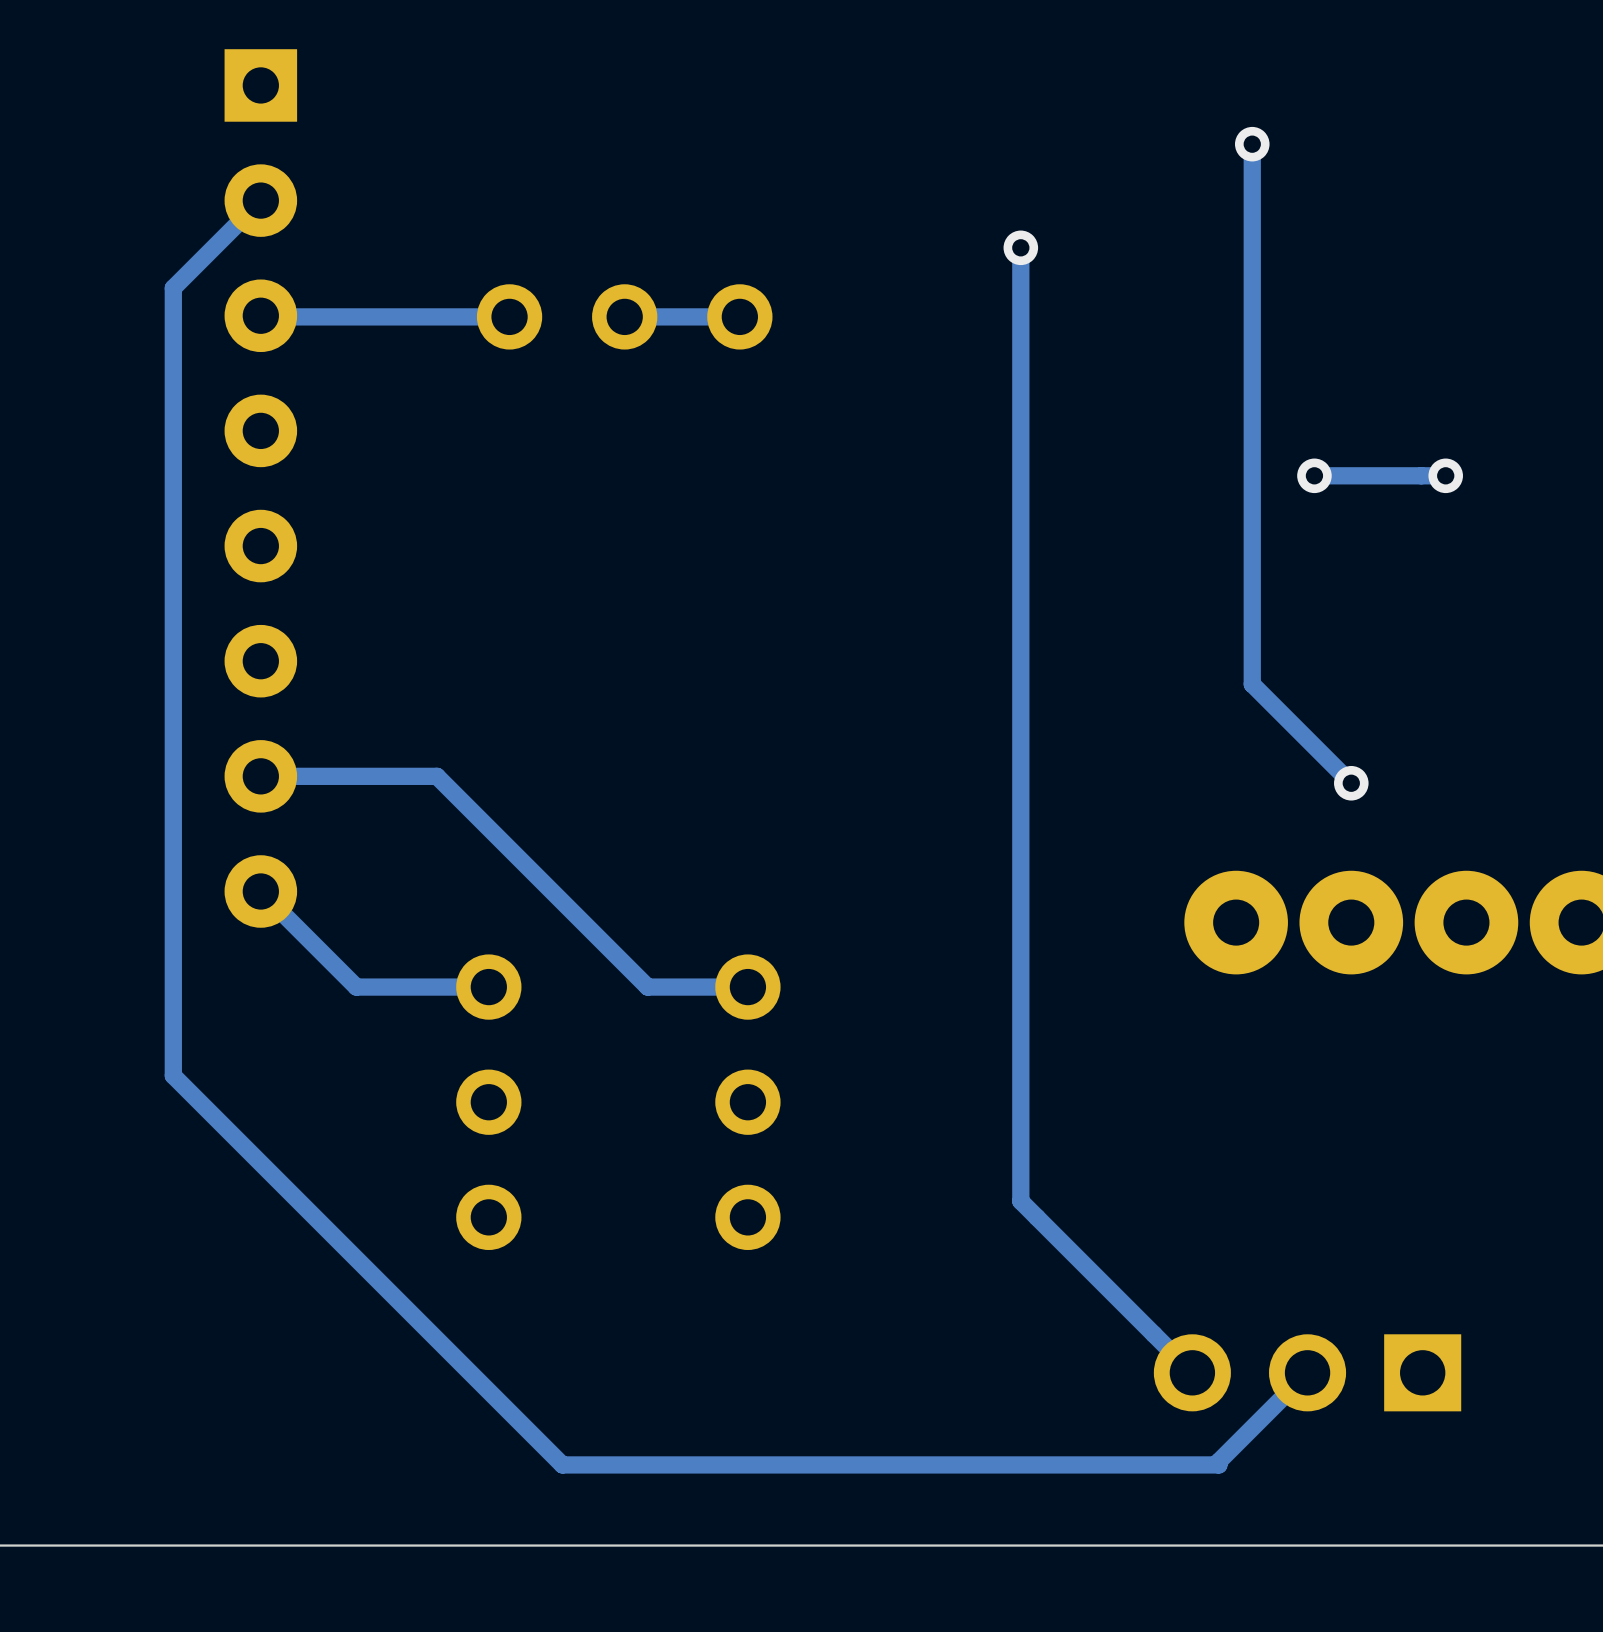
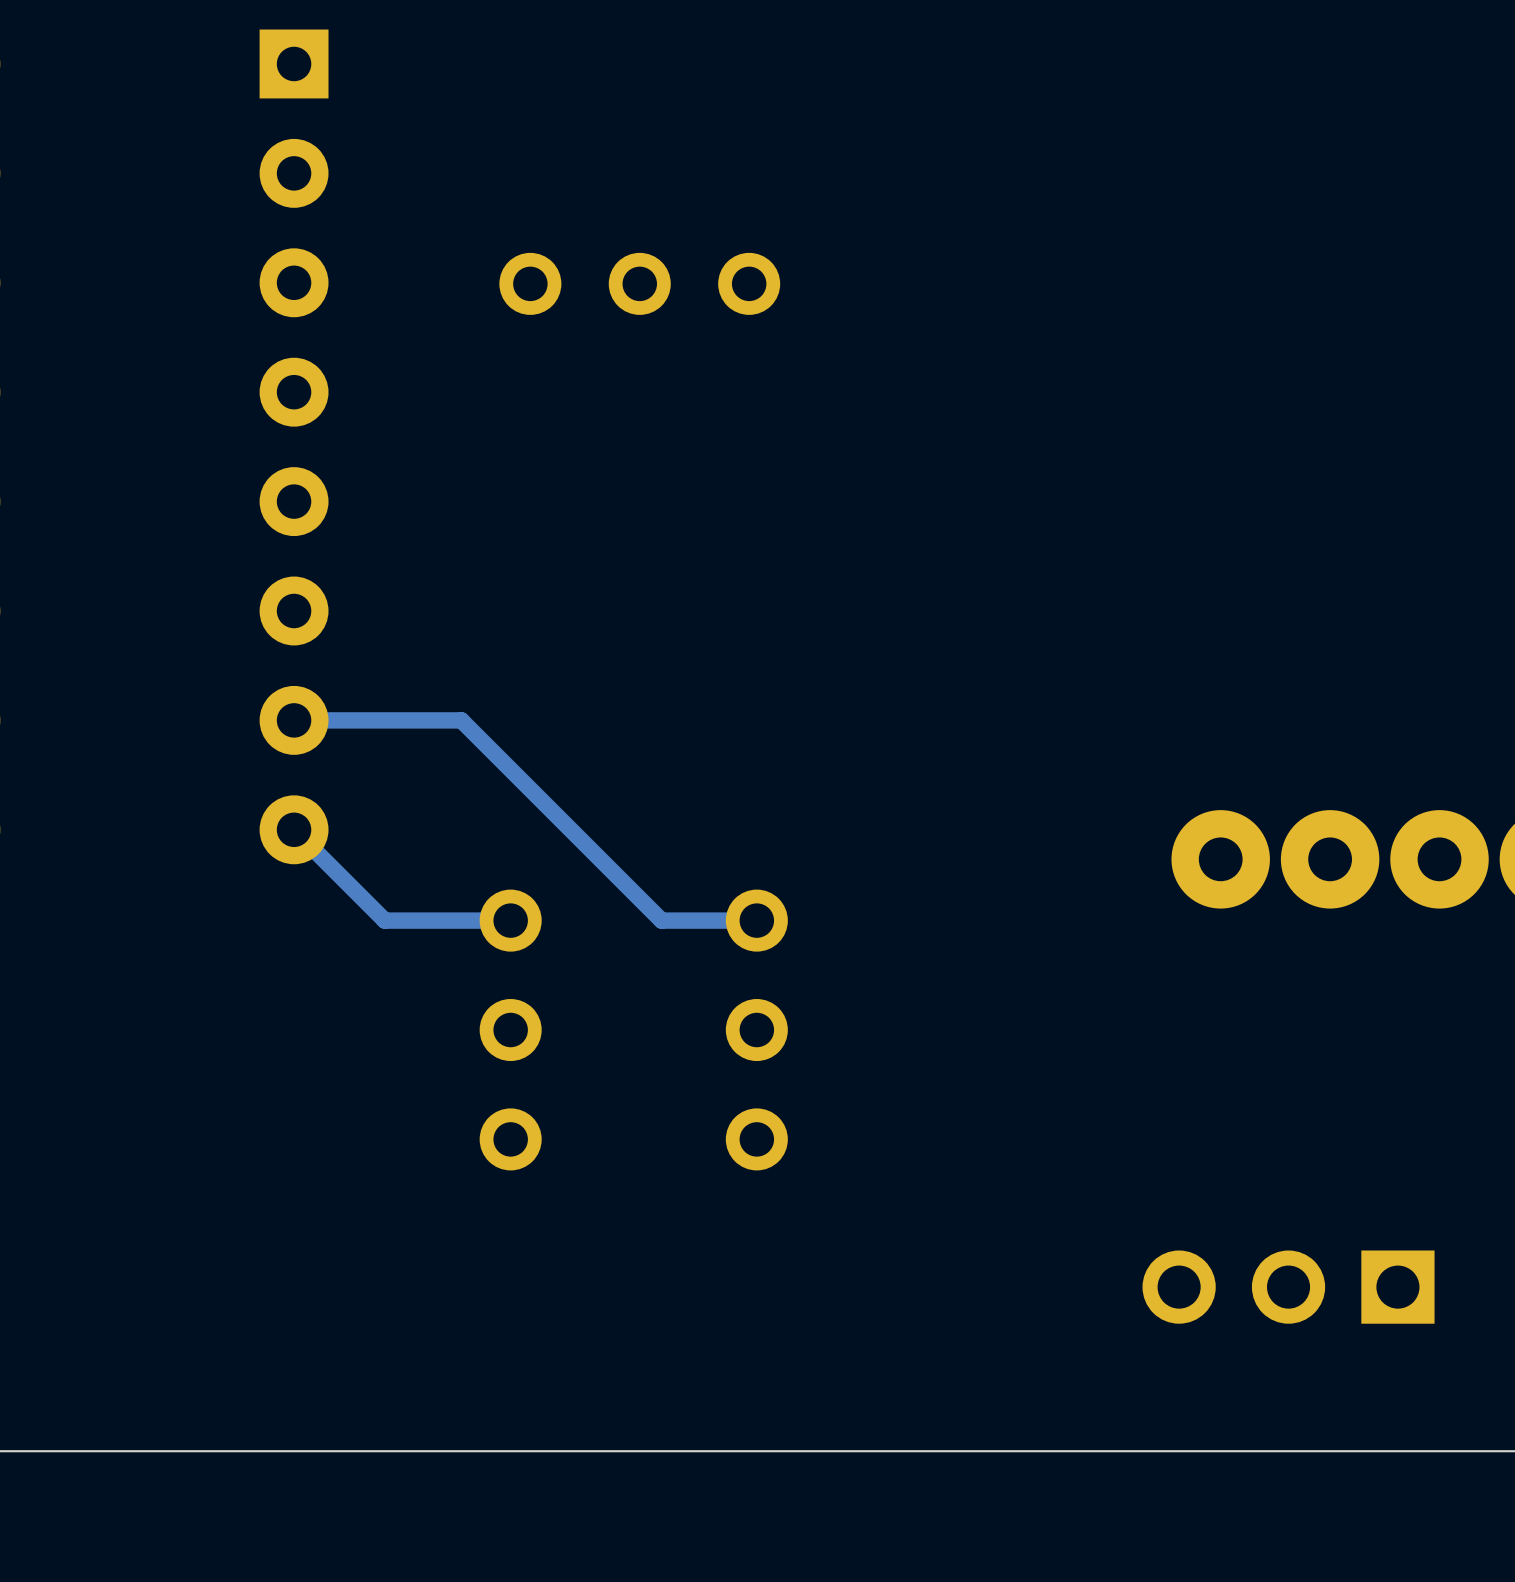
track: (1252, 144) (1252, 684) (1351, 783) -> none
via: (1252, 144) -> none
track: (260, 200) (173, 288) (173, 1075) (562, 1464) (1218, 1464) (1218, 1461) (1307, 1372) -> none
track: (1020, 247) (1020, 1201) (1192, 1372) -> none
via: (1020, 247) -> none
track: (260, 315) (509, 316) -> none
track: (739, 316) (624, 316) -> none
via: (1314, 475) -> none
track: (1445, 475) (1314, 475) -> none
via: (1445, 475) -> none
via: (1351, 783) -> none

